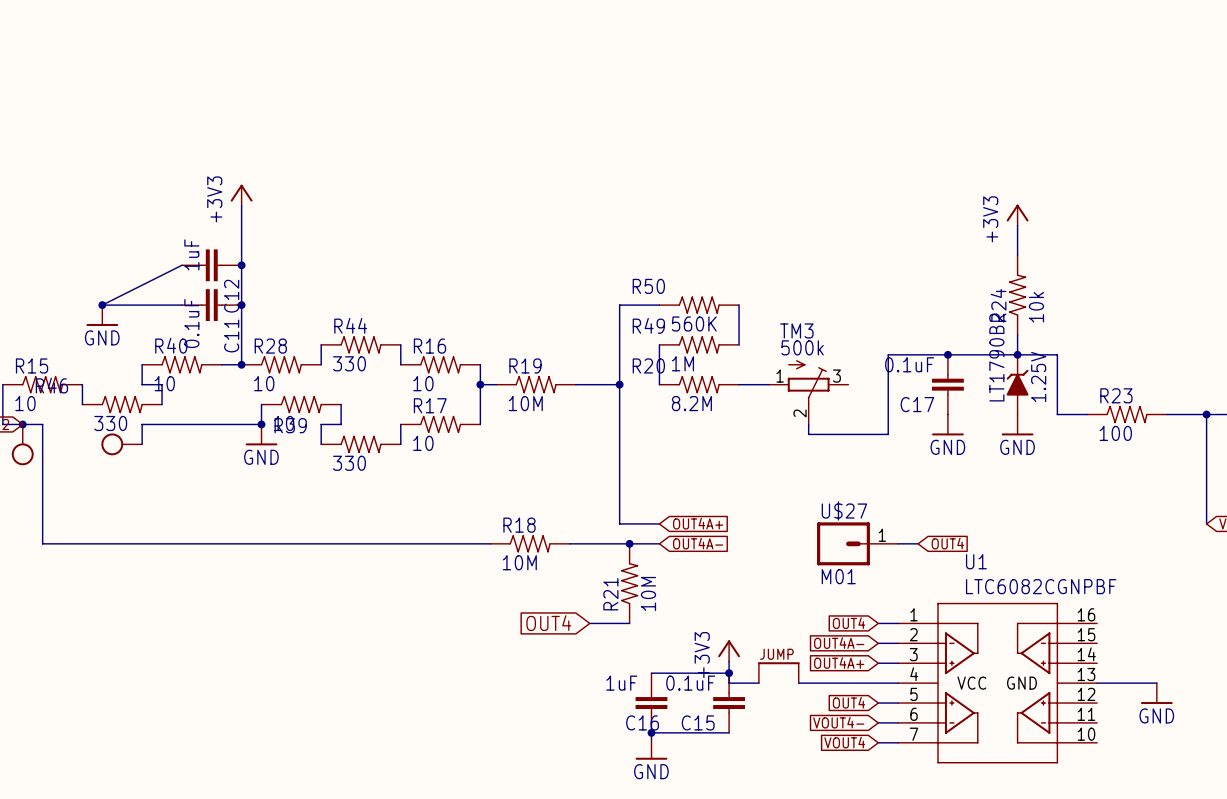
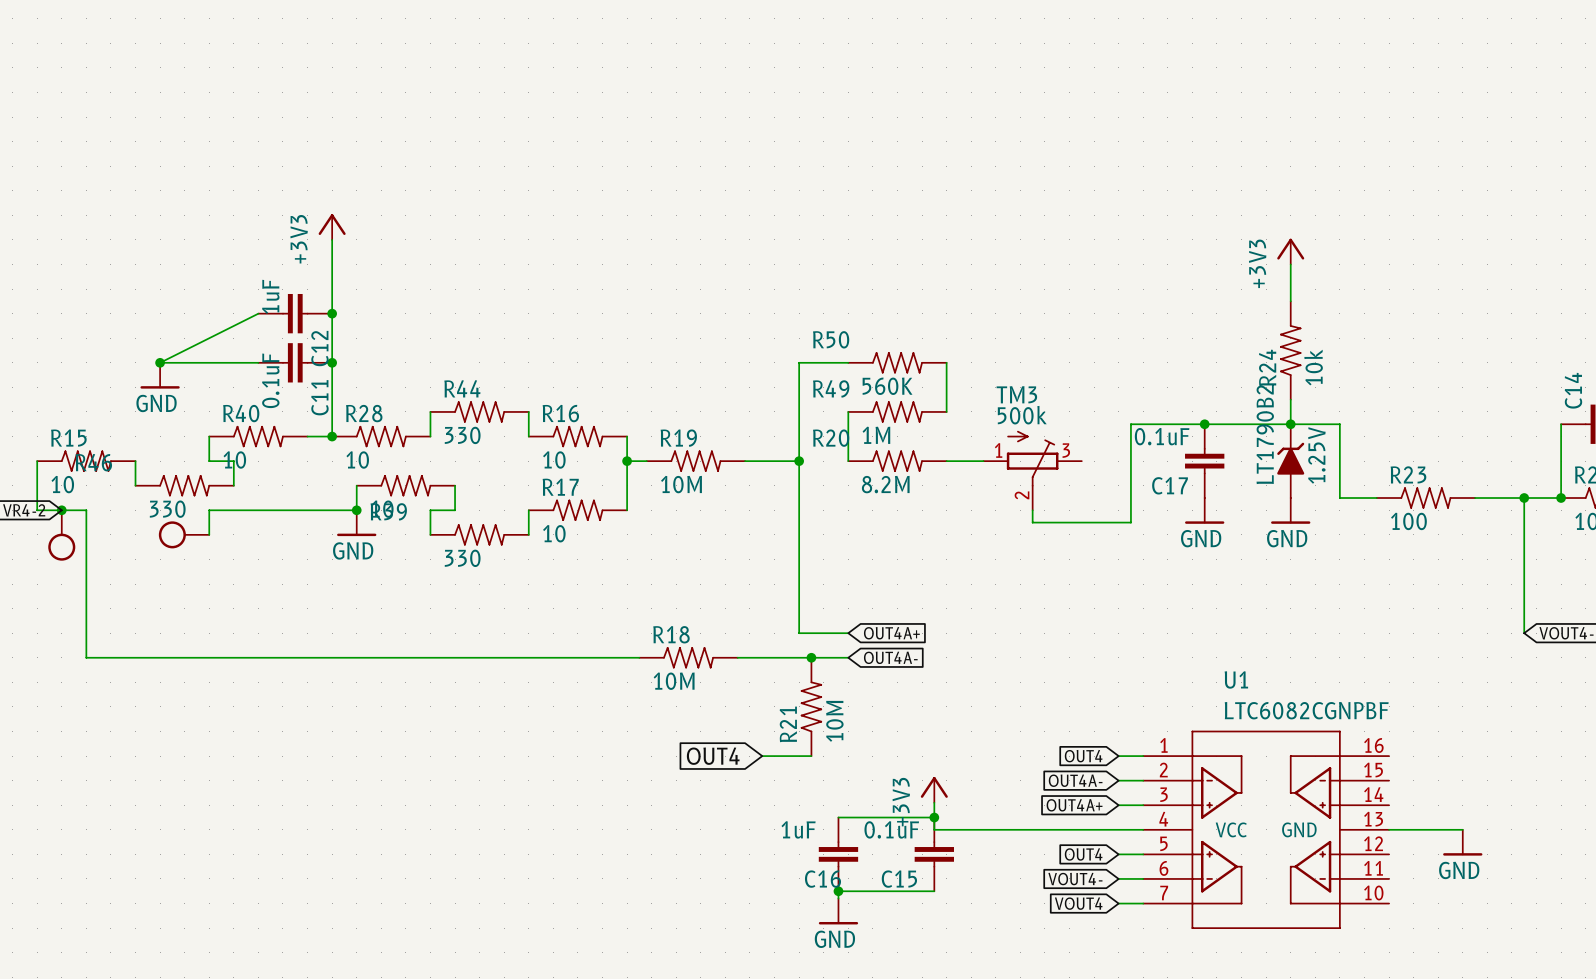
U$27: M01 (857, 543) -> none
wire: (898, 543) (918, 543) -> none
global label: OUT4 (947, 543) -> none
part: (778, 672) -> none
wire: none -> (971, 829) (1020, 829)

